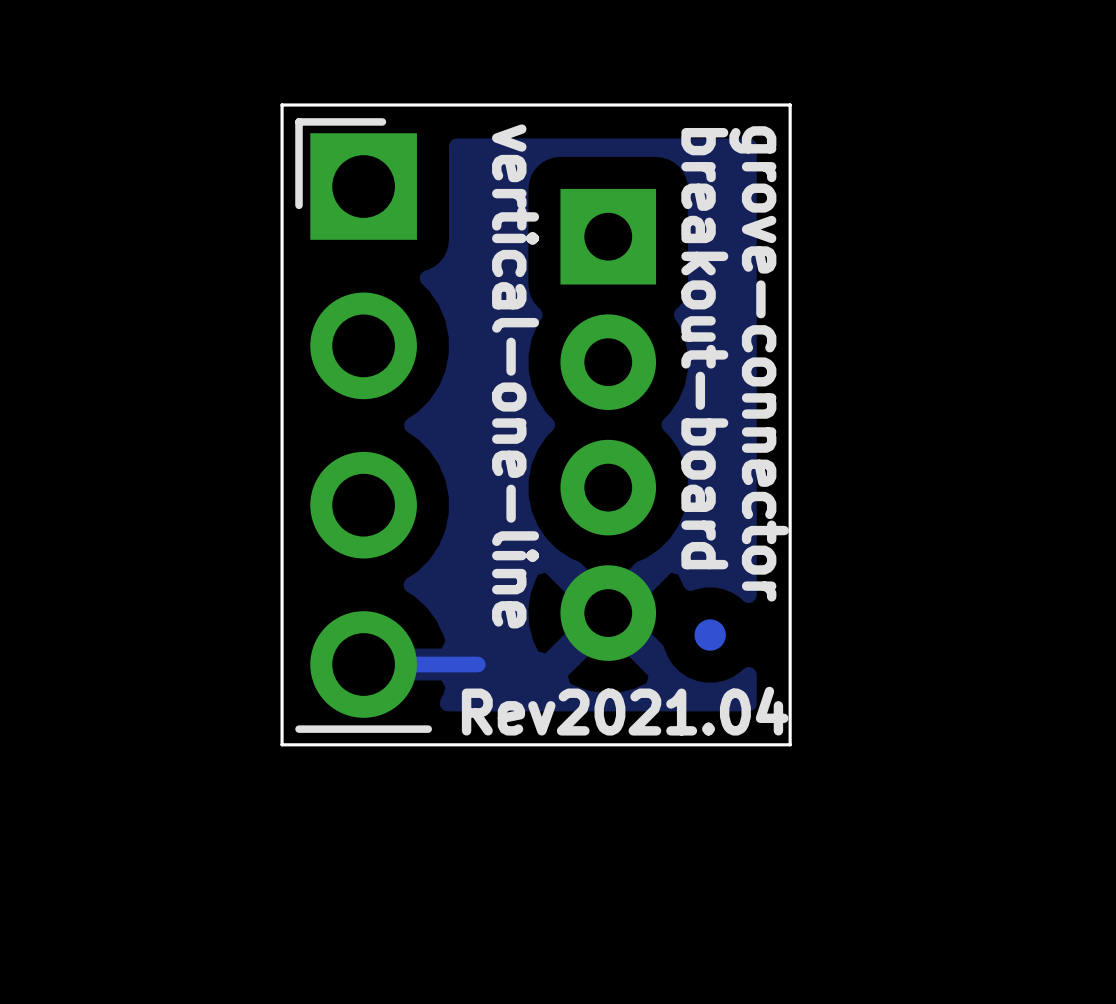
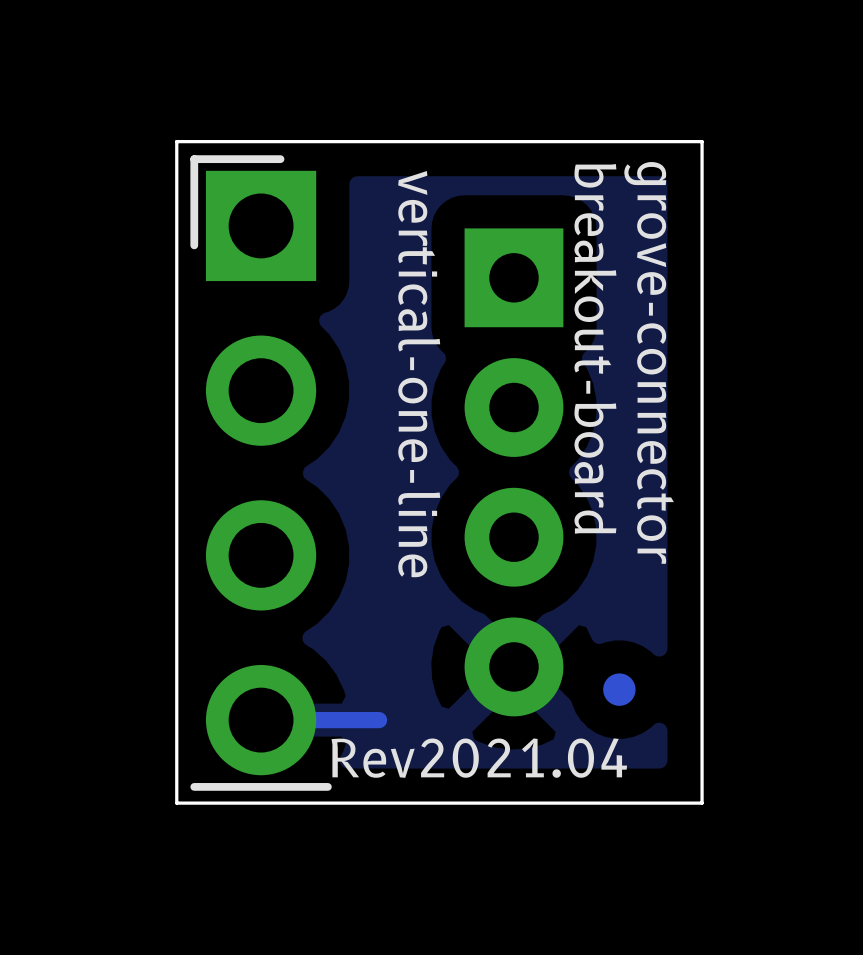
text position: breakout-board (704, 348) -> breakout-board (595, 348)
text position: grove-connector (759, 363) -> grove-connector (649, 362)
text position: vertical-one-line (515, 376) -> vertical-one-line (419, 374)
text position: Rev2021.04 (625, 711) -> Rev2021.04 (479, 758)

